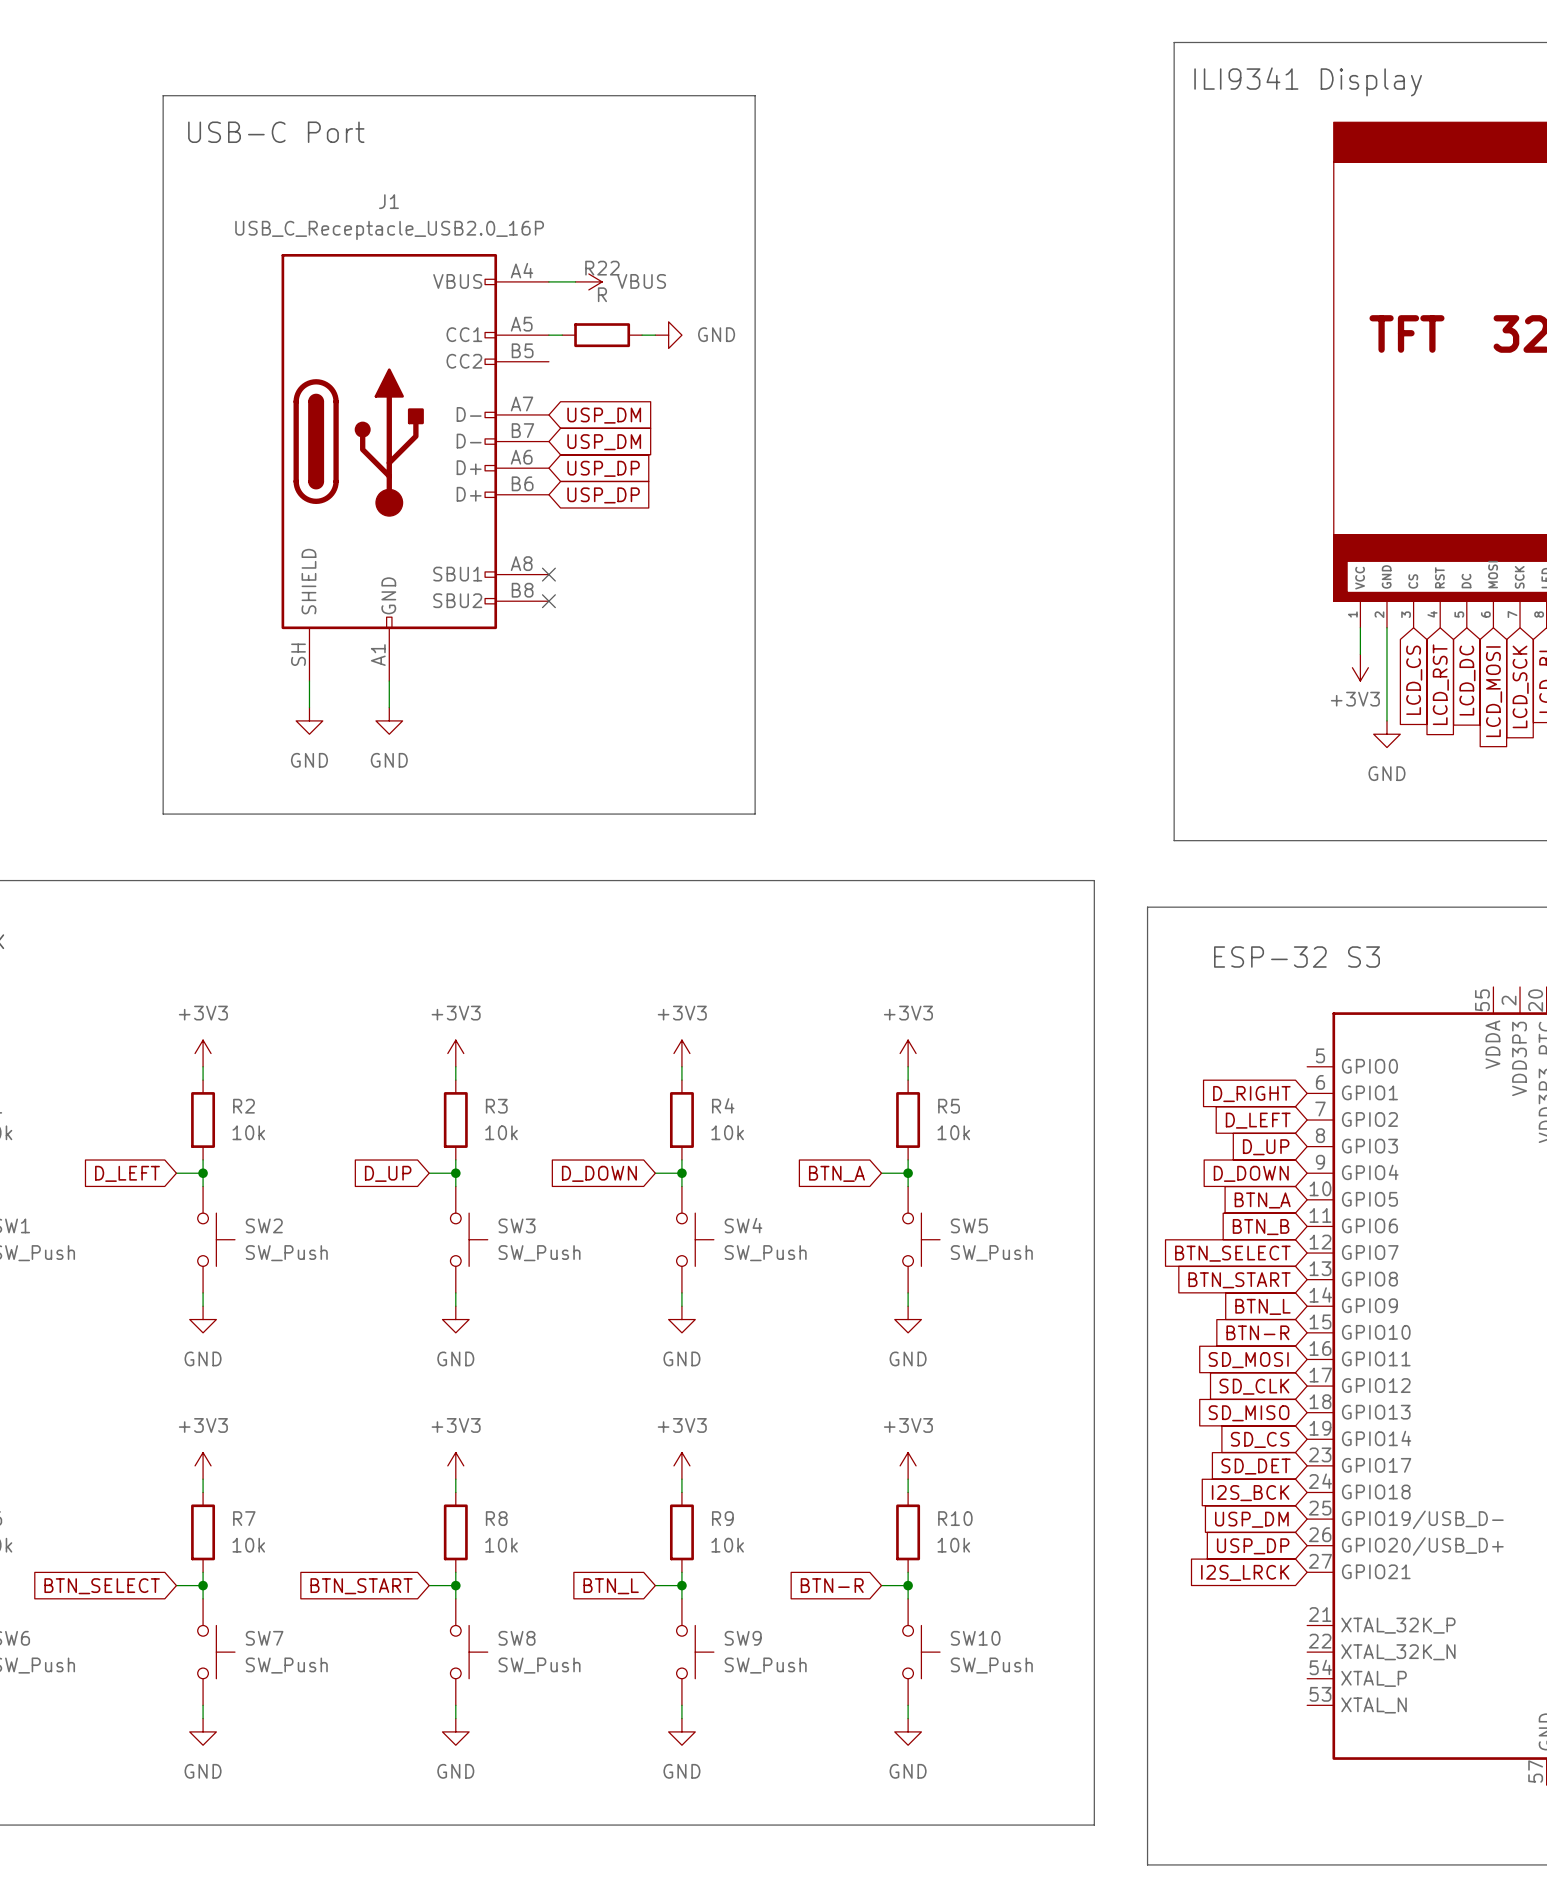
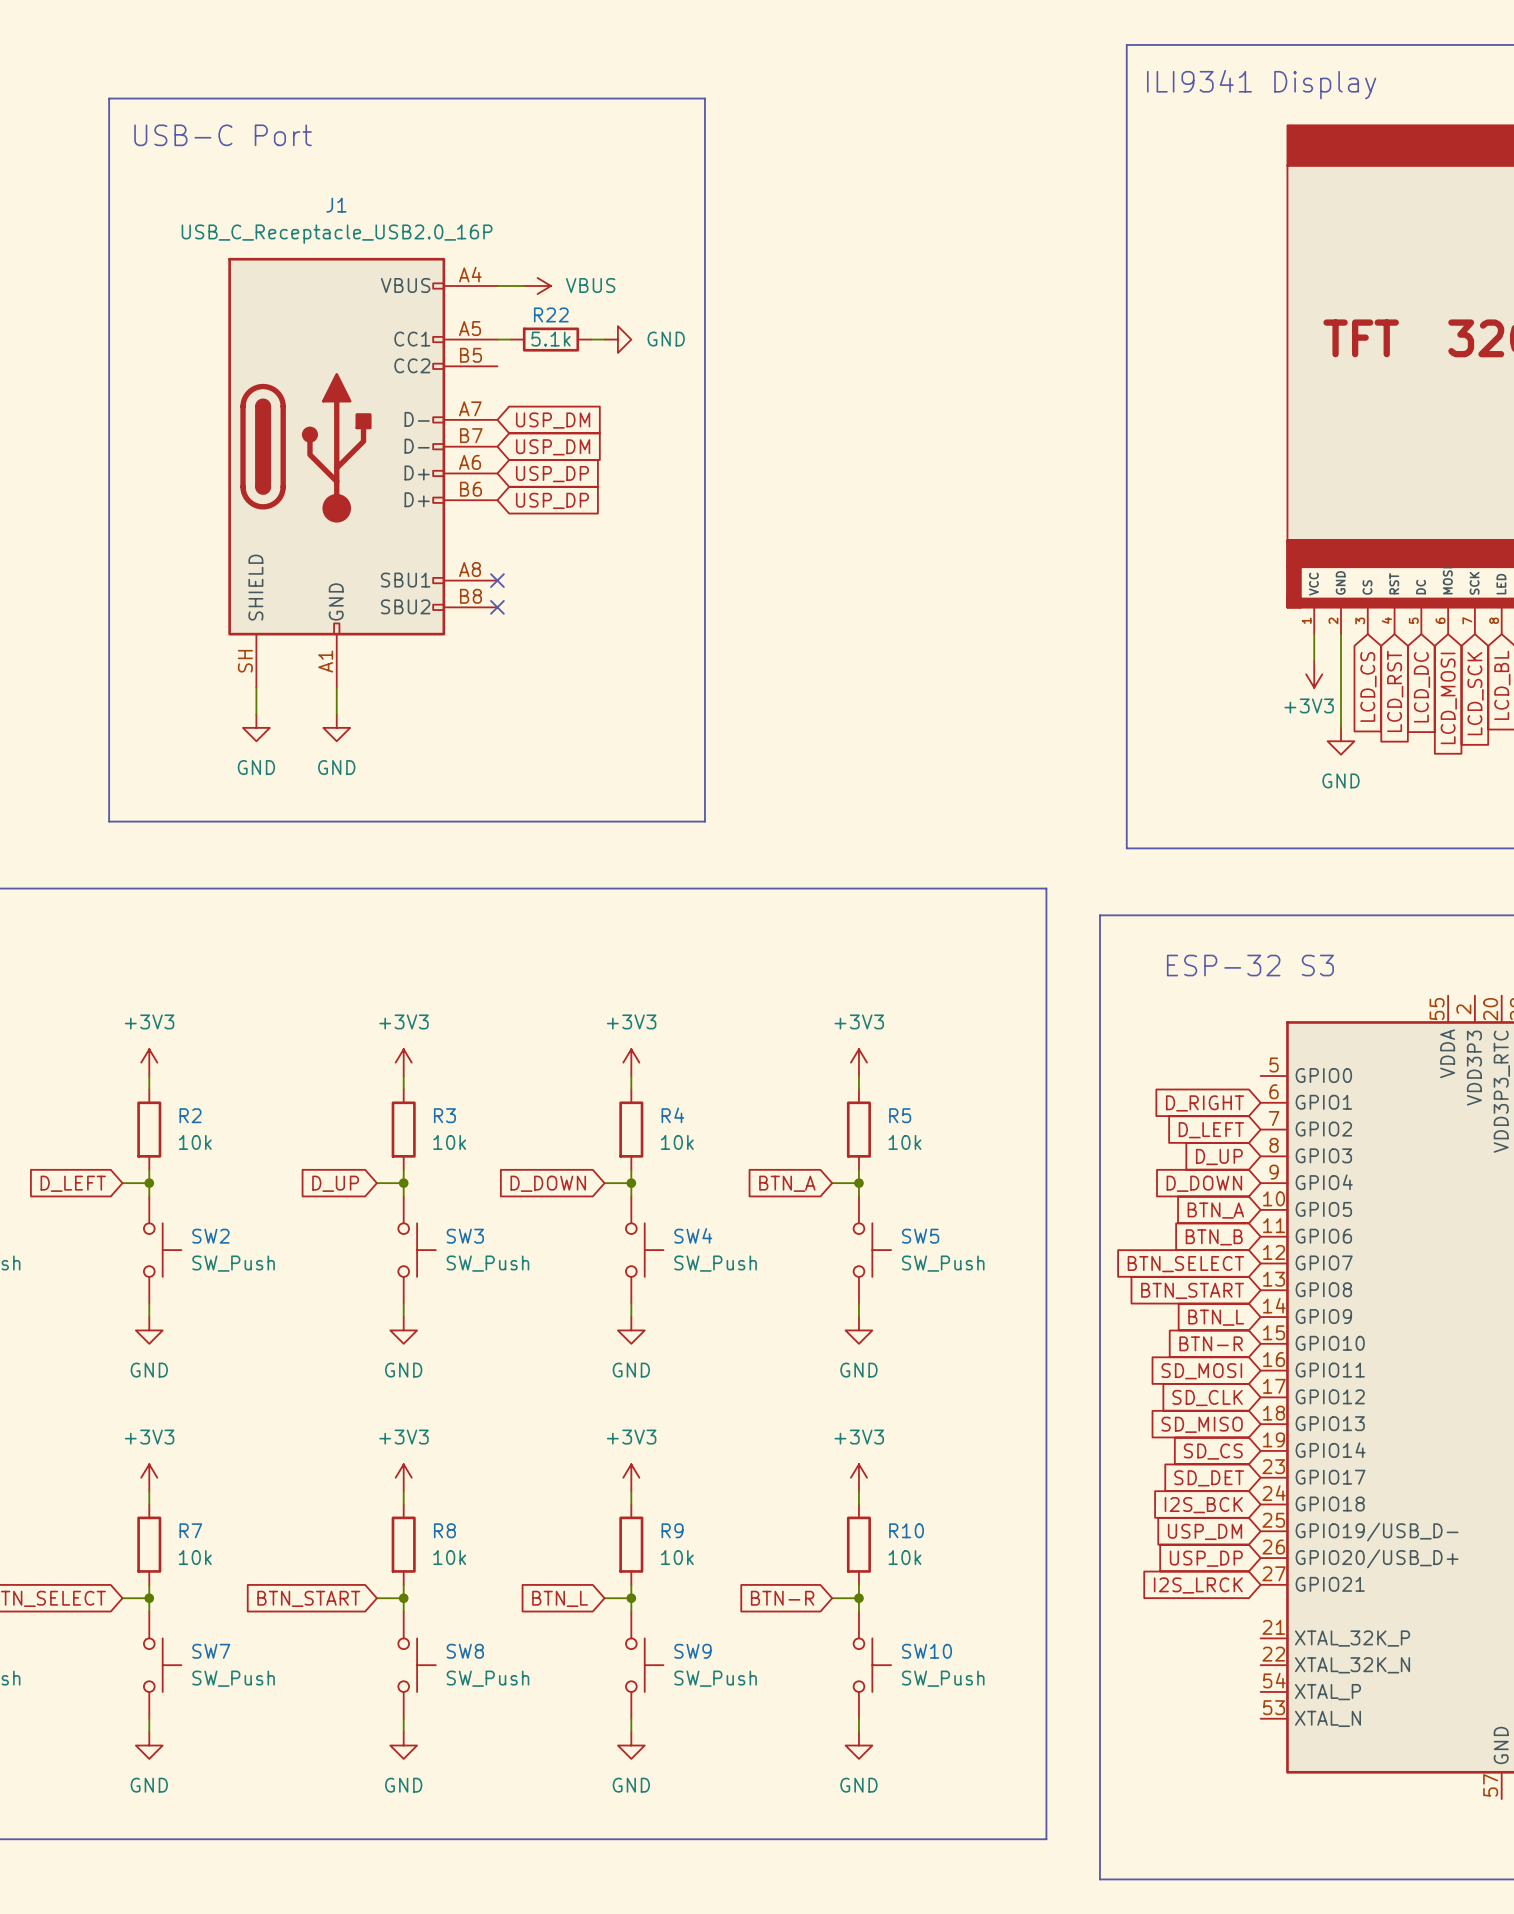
R22 name position: R22 (602, 268) -> R22 (551, 314)
R22 value: R (602, 294) -> 5.1k (550, 339)

